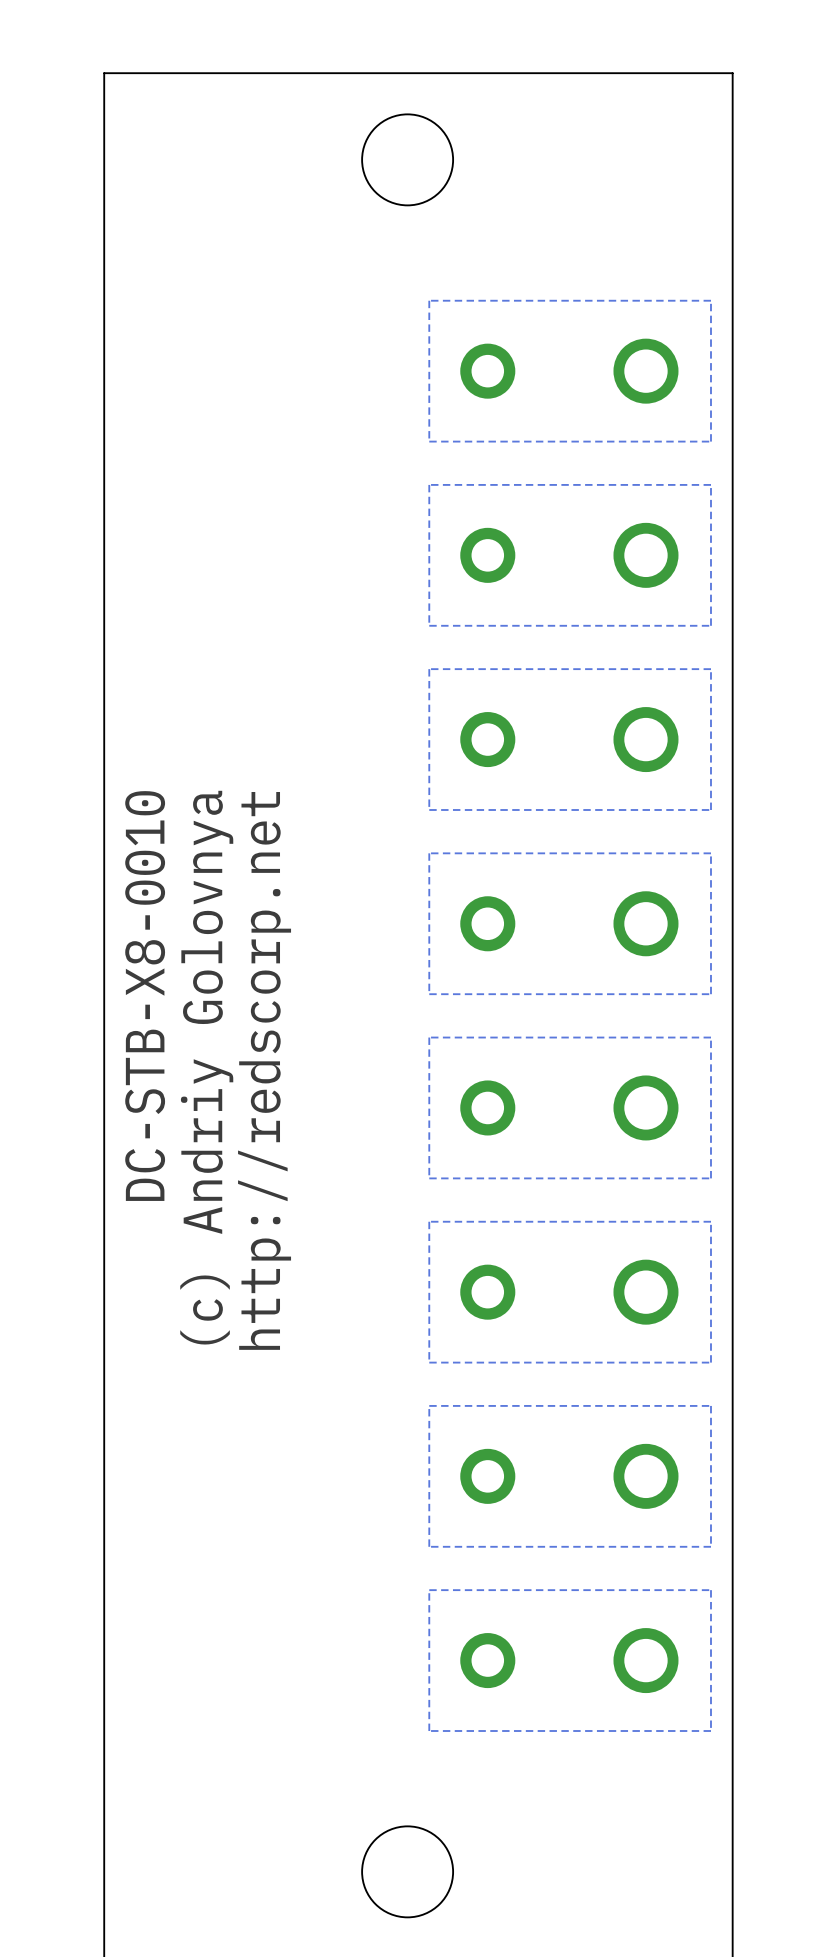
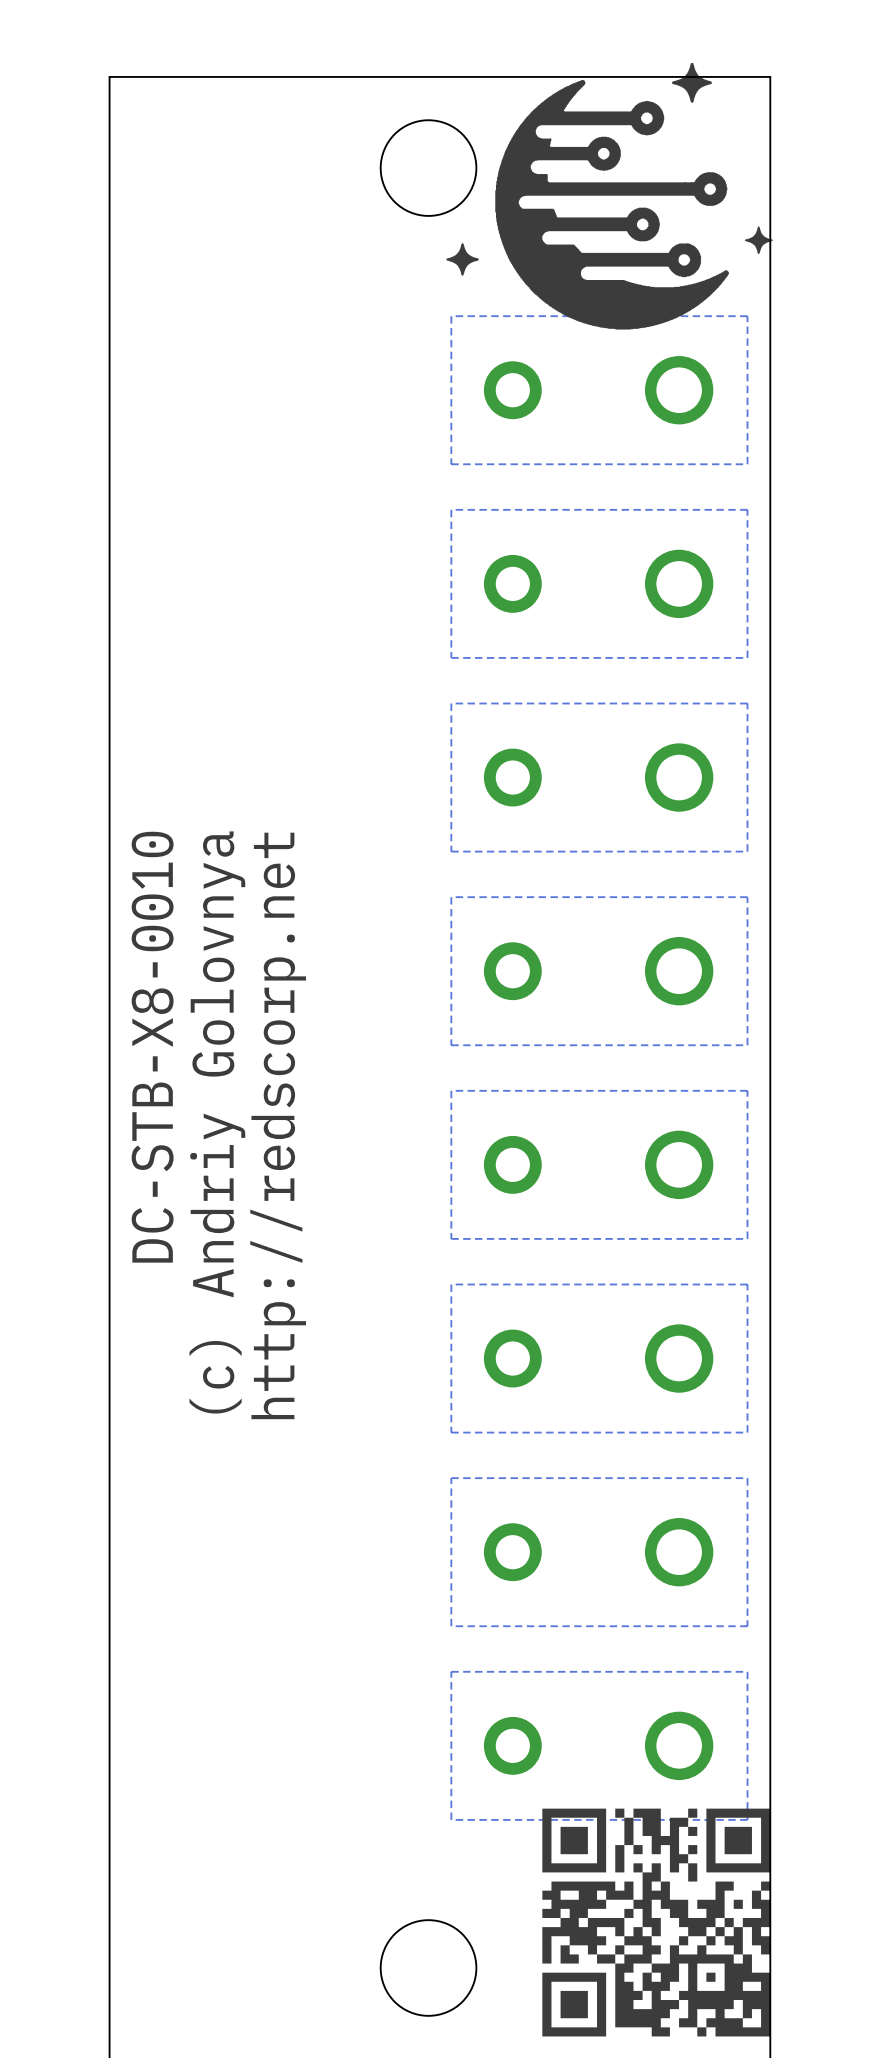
drawing: none -> [446, 62, 773, 330]
drawing: none -> [542, 1808, 771, 2037]

